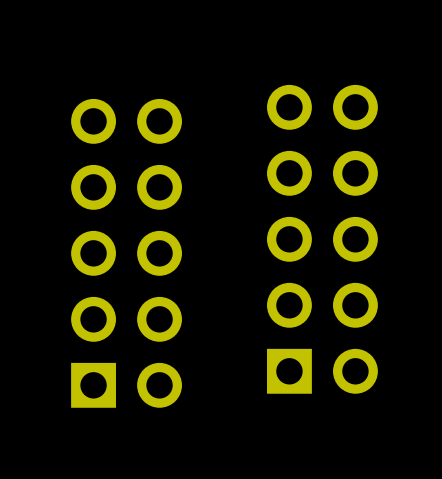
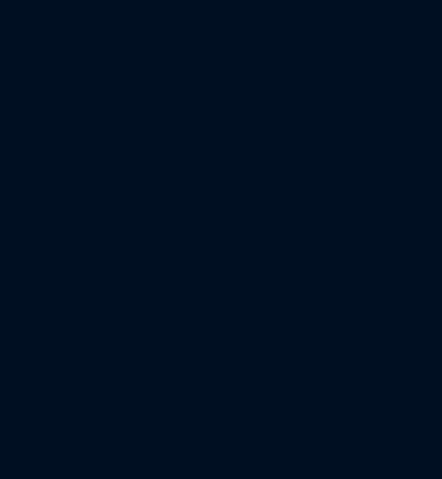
part: (322, 239) -> none
part: (126, 253) -> none

